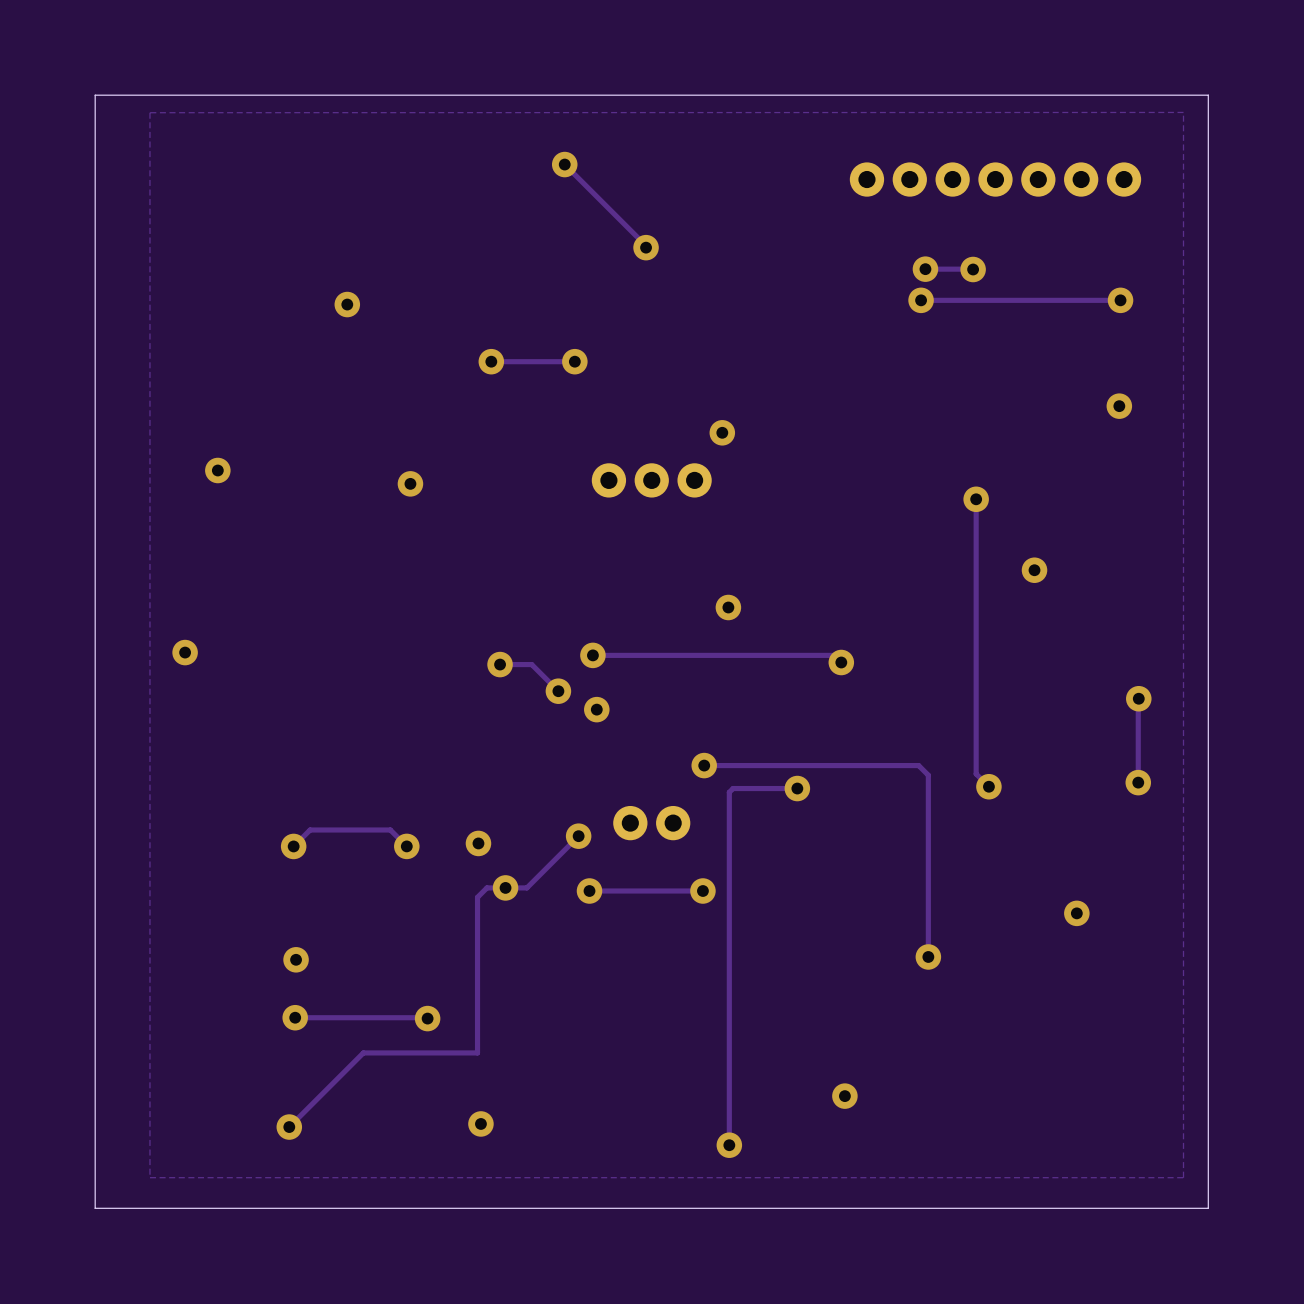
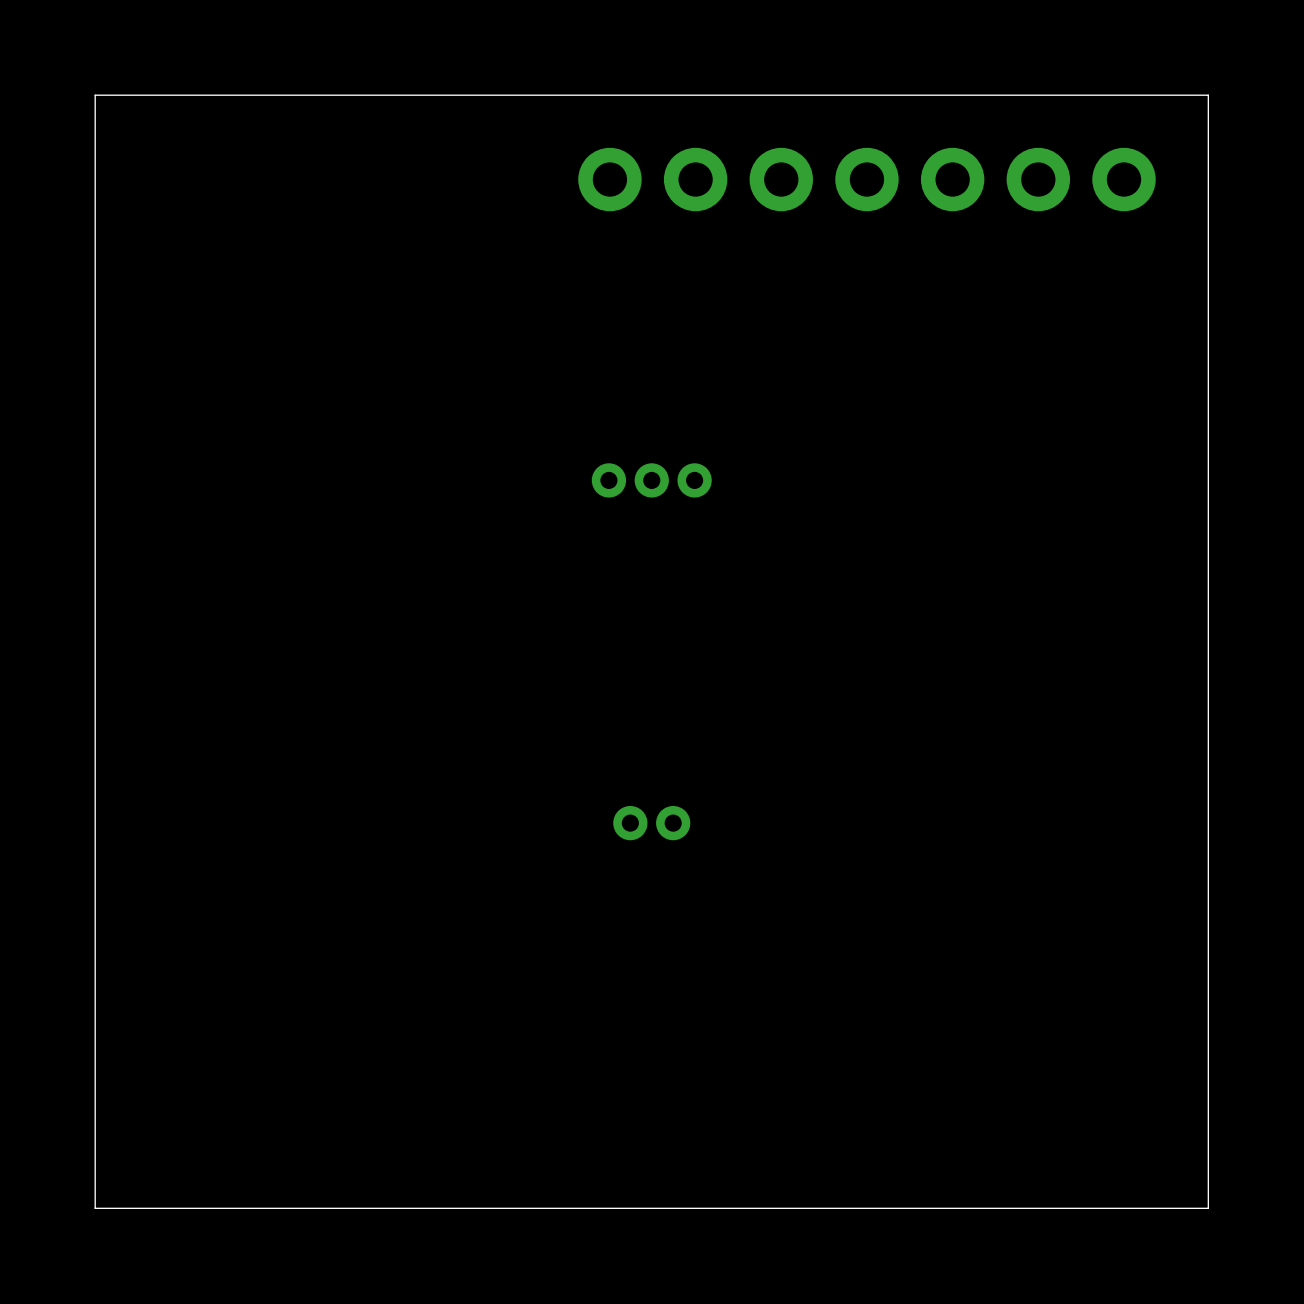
zone outline: (1183, 112) (1183, 1177) (149, 1177) (149, 112) (1183, 112) -> none
track: (564, 164) (646, 247) -> none
via: (564, 164) -> none
part: none -> (866, 179)
part: (995, 179) -> none
via: (646, 247) -> none
via: (925, 269) -> none
track: (972, 269) (925, 269) -> none
via: (973, 269) -> none
via: (921, 300) -> none
track: (1120, 300) (921, 300) -> none
via: (1120, 300) -> none
via: (347, 304) -> none
via: (491, 361) -> none
track: (574, 361) (491, 361) -> none
via: (574, 361) -> none
via: (1119, 406) -> none
via: (722, 432) -> none
via: (217, 470) -> none
via: (410, 483) -> none
track: (976, 499) (976, 773) (988, 786) -> none
via: (976, 499) -> none
via: (1034, 570) -> none
via: (728, 607) -> none
via: (185, 652) -> none
track: (592, 655) (834, 655) (841, 662) -> none
via: (592, 655) -> none
via: (841, 662) -> none
track: (500, 664) (531, 664) (558, 691) -> none
via: (500, 664) -> none
via: (558, 691) -> none
track: (1138, 698) (1138, 782) -> none
via: (1138, 698) -> none
via: (596, 709) -> none
track: (704, 765) (918, 765) (928, 775) (928, 956) -> none
via: (704, 765) -> none
via: (1138, 782) -> none
via: (988, 786) -> none
track: (797, 788) (733, 788) (729, 792) (729, 1145) -> none
via: (797, 788) -> none
track: (578, 836) (526, 887) (486, 887) (477, 897) (477, 1052) (363, 1052) (289, 1127) -> none
via: (578, 836) -> none
via: (478, 843) -> none
via: (293, 846) -> none
track: (406, 846) (390, 830) (310, 830) (293, 846) -> none
via: (406, 846) -> none
via: (505, 887) -> none
via: (589, 891) -> none
track: (702, 891) (589, 891) -> none
via: (702, 891) -> none
via: (1076, 913) -> none
via: (928, 956) -> none
via: (296, 959) -> none
track: (295, 1017) (427, 1018) -> none
via: (295, 1017) -> none
via: (427, 1018) -> none
via: (844, 1096) -> none
via: (480, 1123) -> none
via: (289, 1127) -> none
via: (729, 1145) -> none

